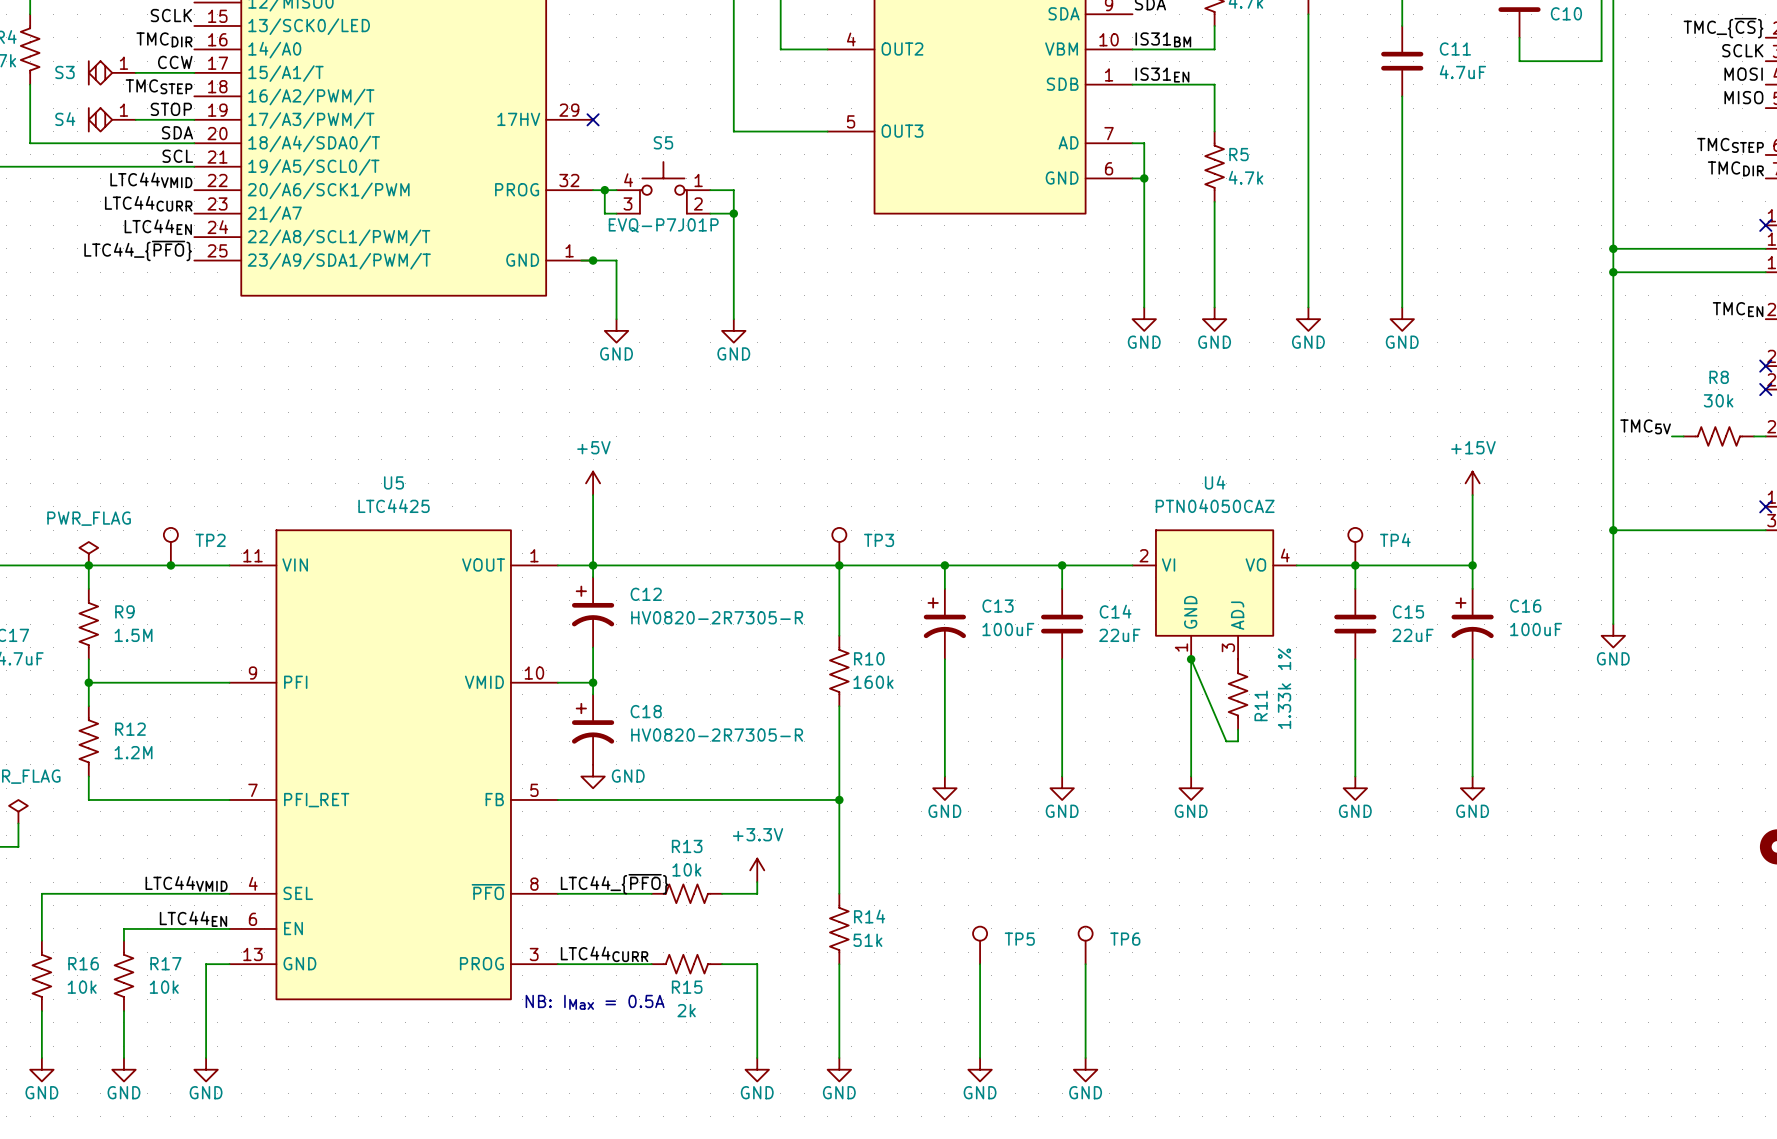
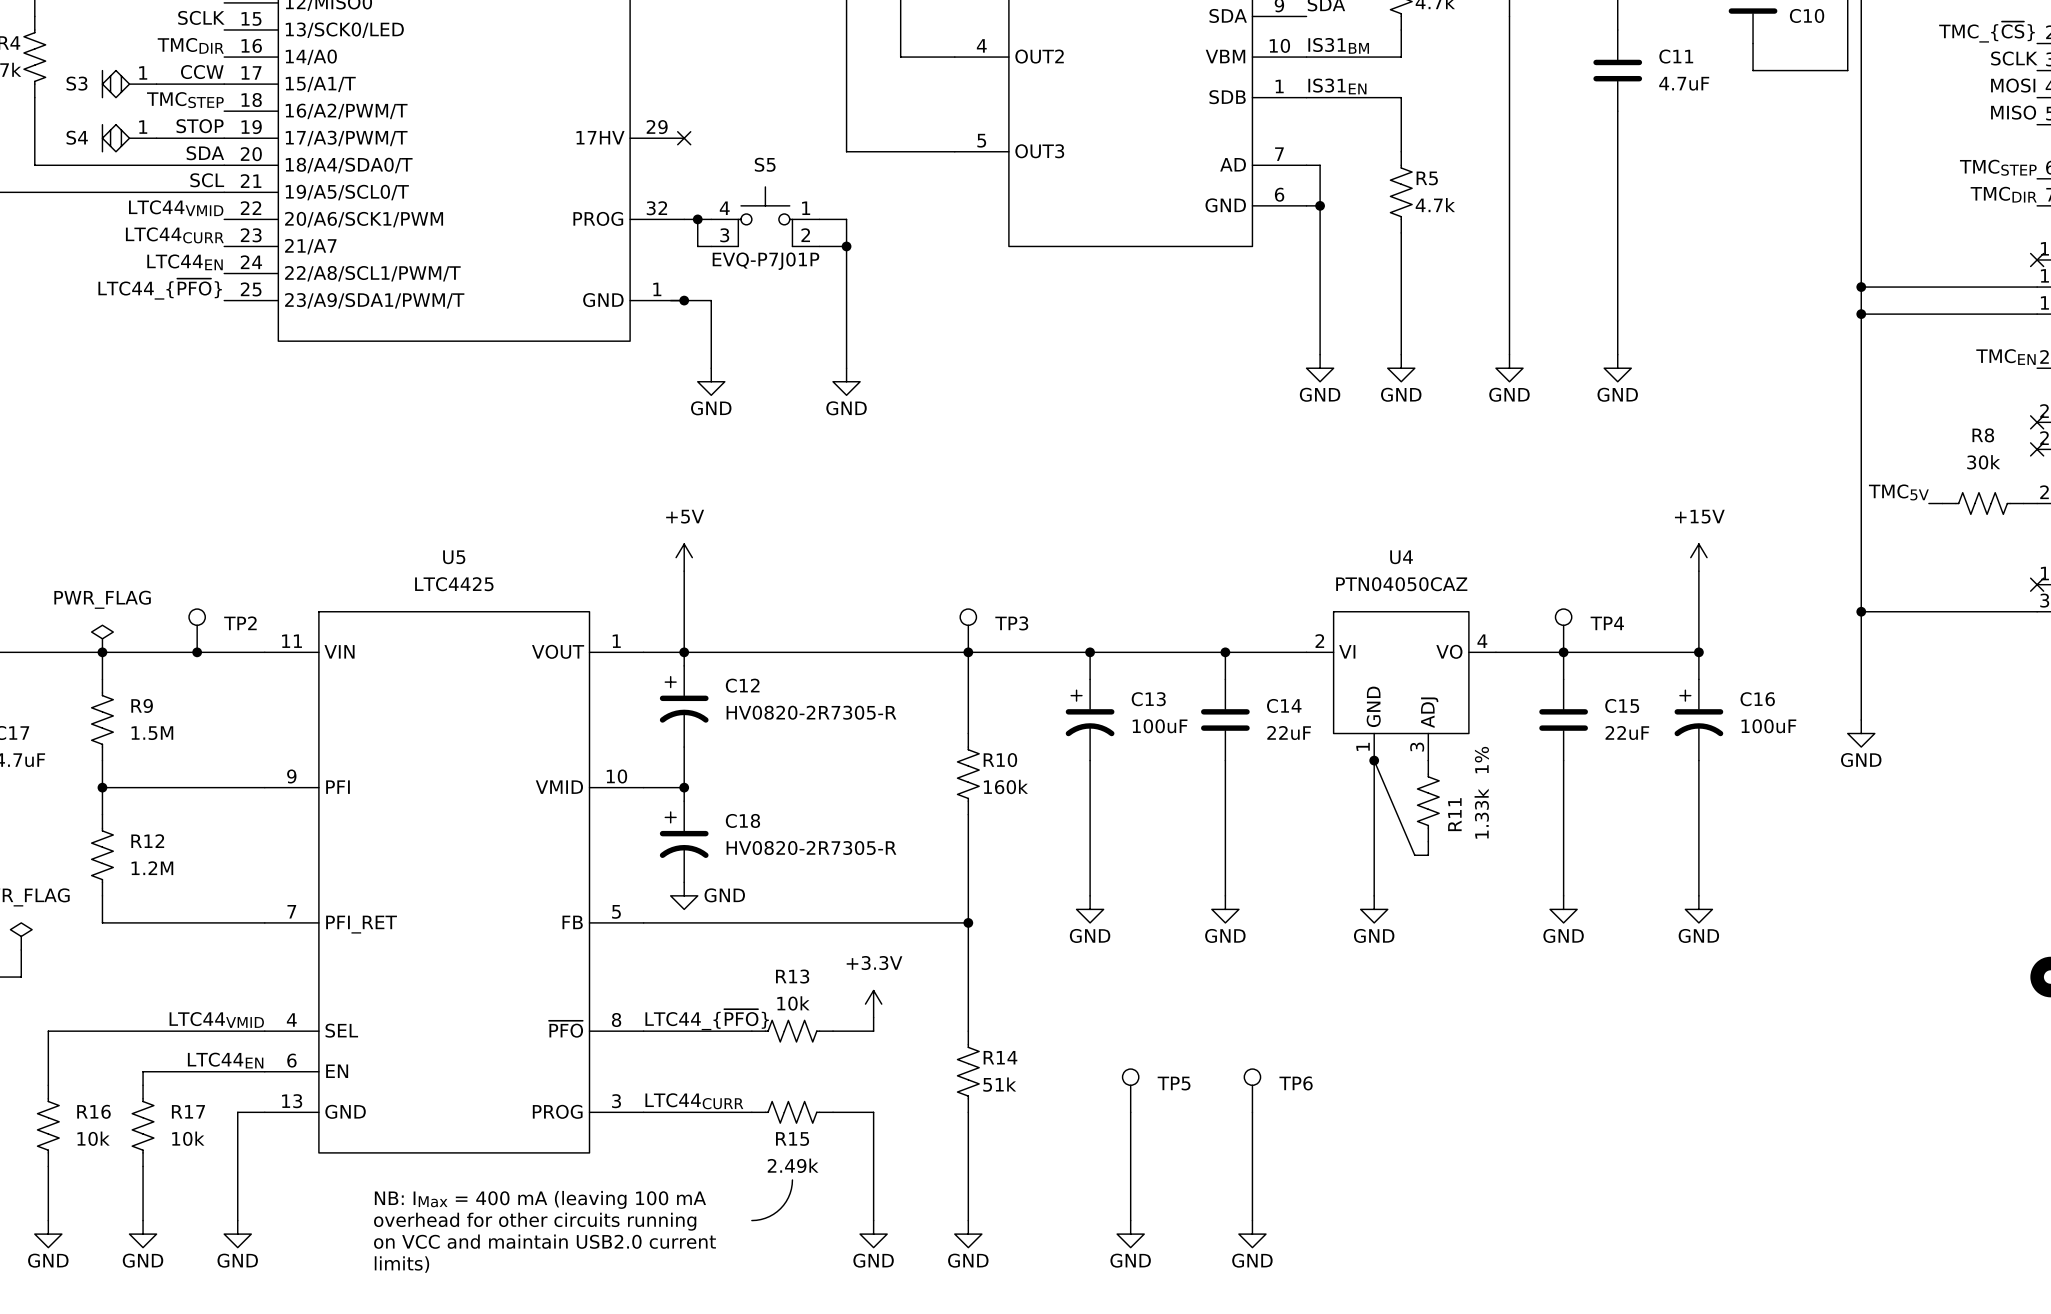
text: NB: IMax = 0.5A (595, 1002) -> none
R15 value: 2k (686, 1010) -> 2.49k (793, 1165)
line: none -> (792, 1179) (788, 1197) (780, 1208) (769, 1216) (751, 1220)
text: none -> NB: IMax = 400 mA (leaving 100 mA (540, 1199)
text: none -> overhead for other circuits running (535, 1221)
text: none -> on VCC and maintain USB2.0 current (544, 1241)
text: none -> limits) (401, 1264)

